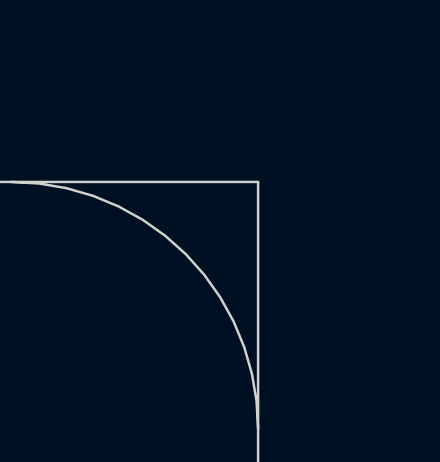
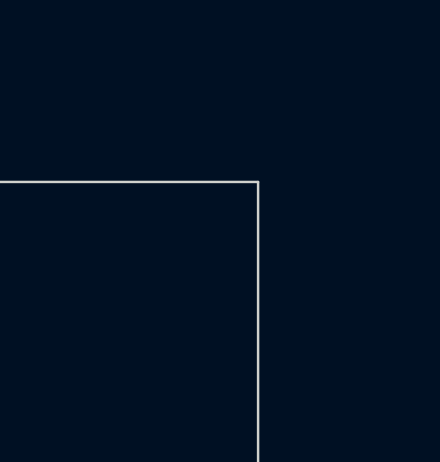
board edge: (11, 181) (39, 183) (66, 188) (92, 195) (118, 206) (142, 219) (165, 235) (185, 254) (204, 274) (220, 297) (233, 321) (244, 347) (251, 373) (256, 400) (258, 428) -> none

